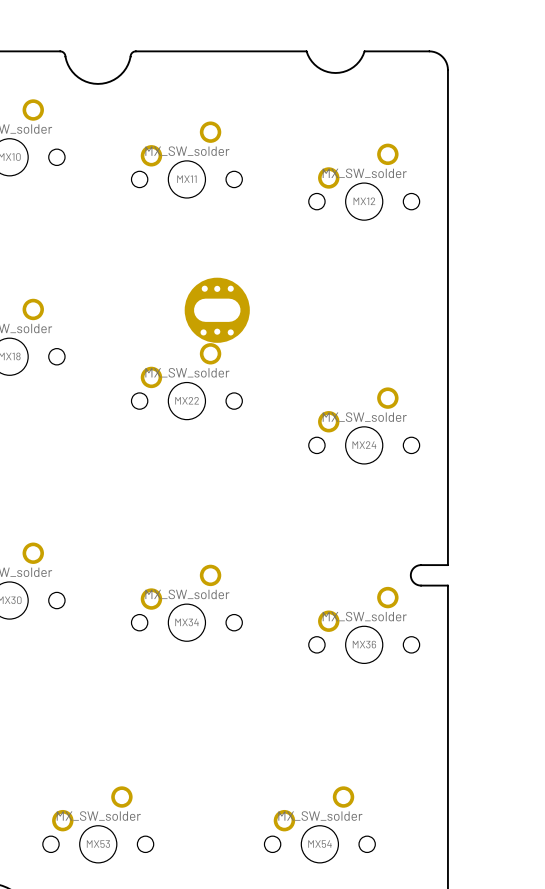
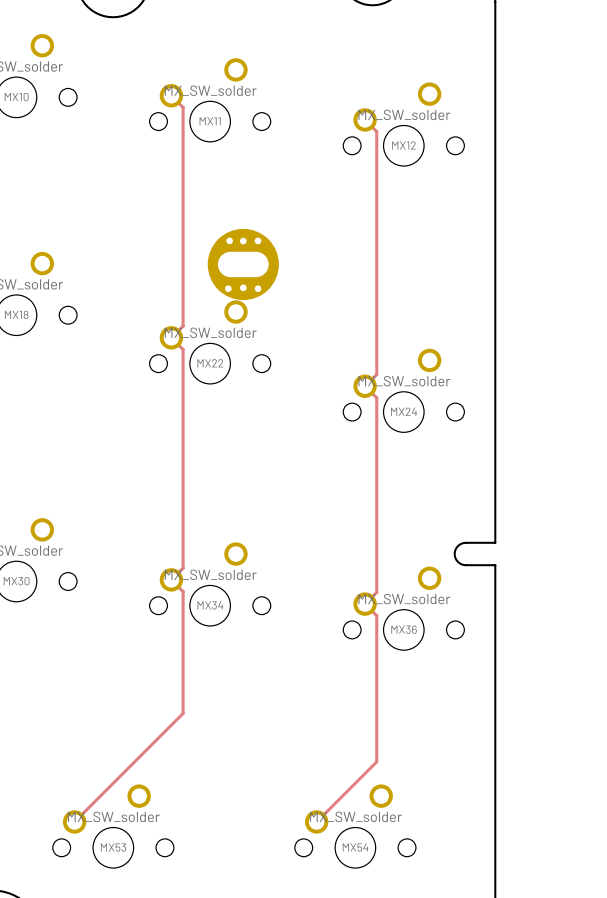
track: none -> (171, 95) (183, 107) (183, 326) (171, 337) (183, 349) (183, 568) (171, 579) (183, 591) (183, 713) (74, 821)
track: none -> (365, 119) (376, 131) (376, 374) (365, 386) (376, 397) (376, 592) (365, 604) (376, 615) (376, 761) (316, 821)

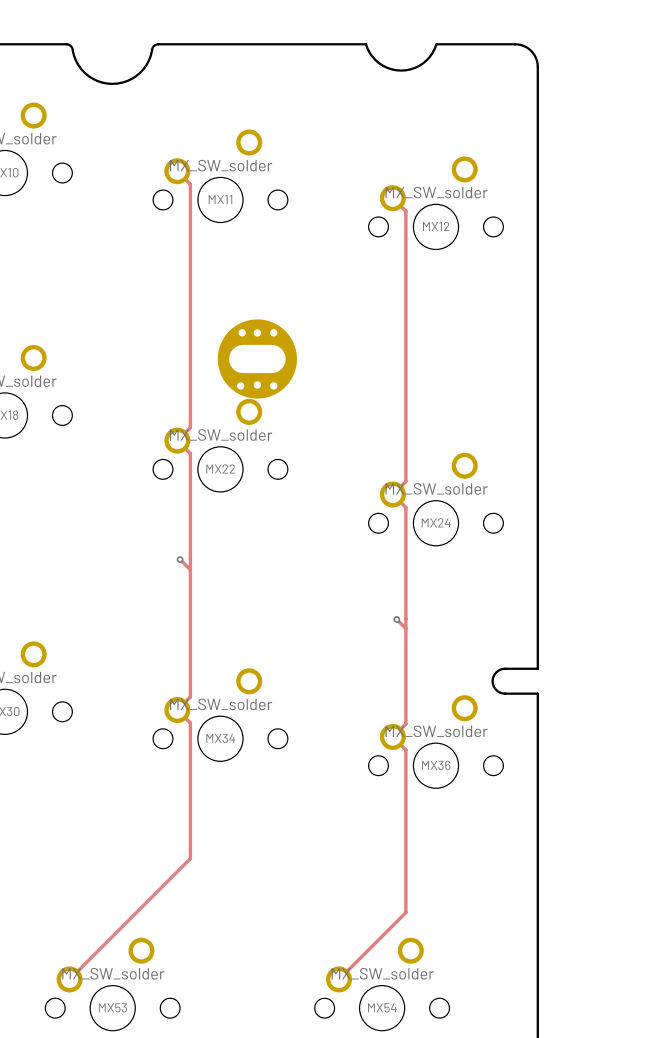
track: none -> (180, 559) (190, 569)
via: none -> (180, 559)
track: none -> (396, 619) (405, 628)
via: none -> (396, 619)

